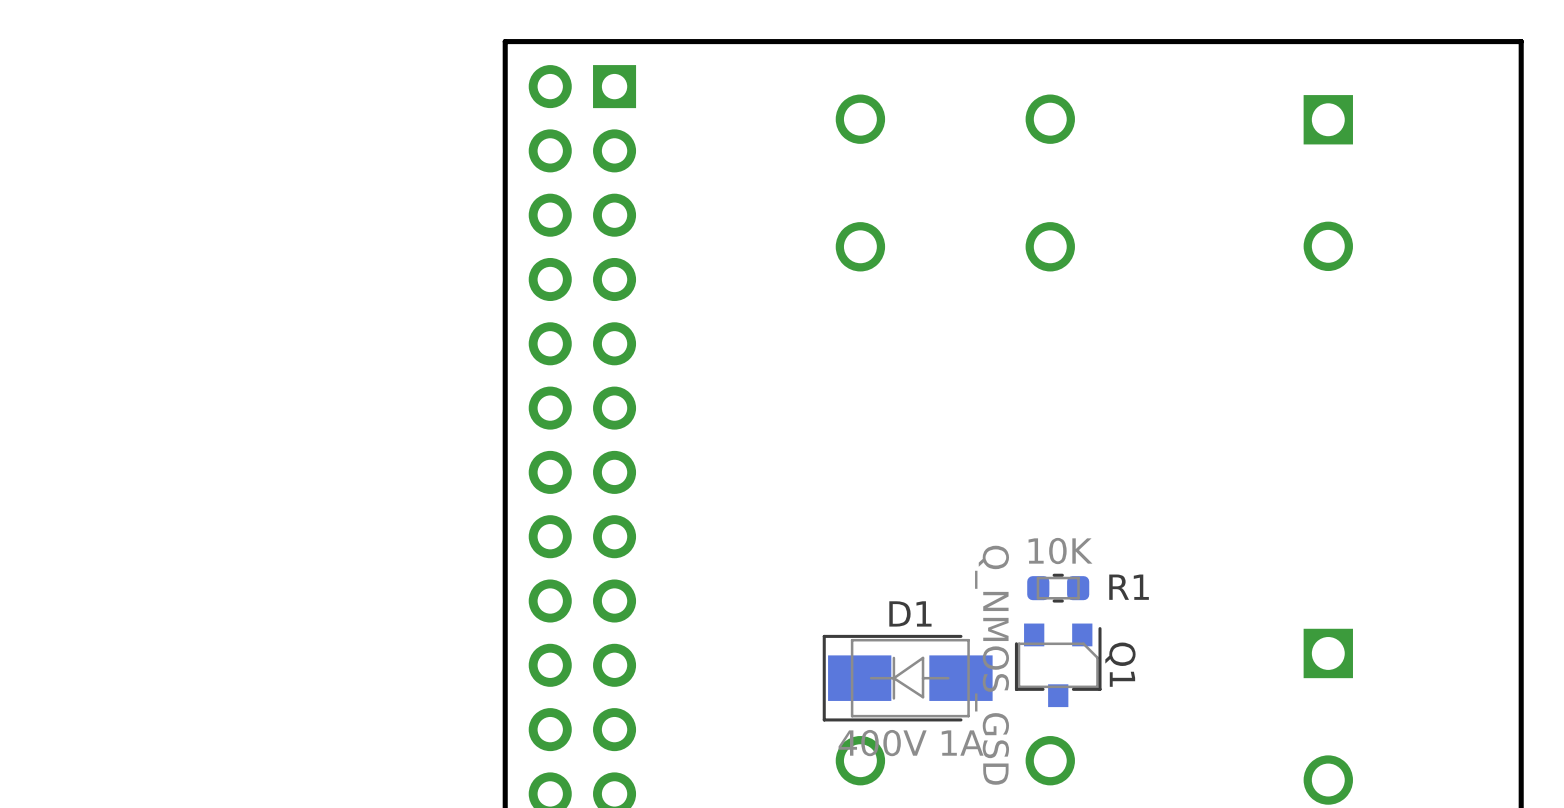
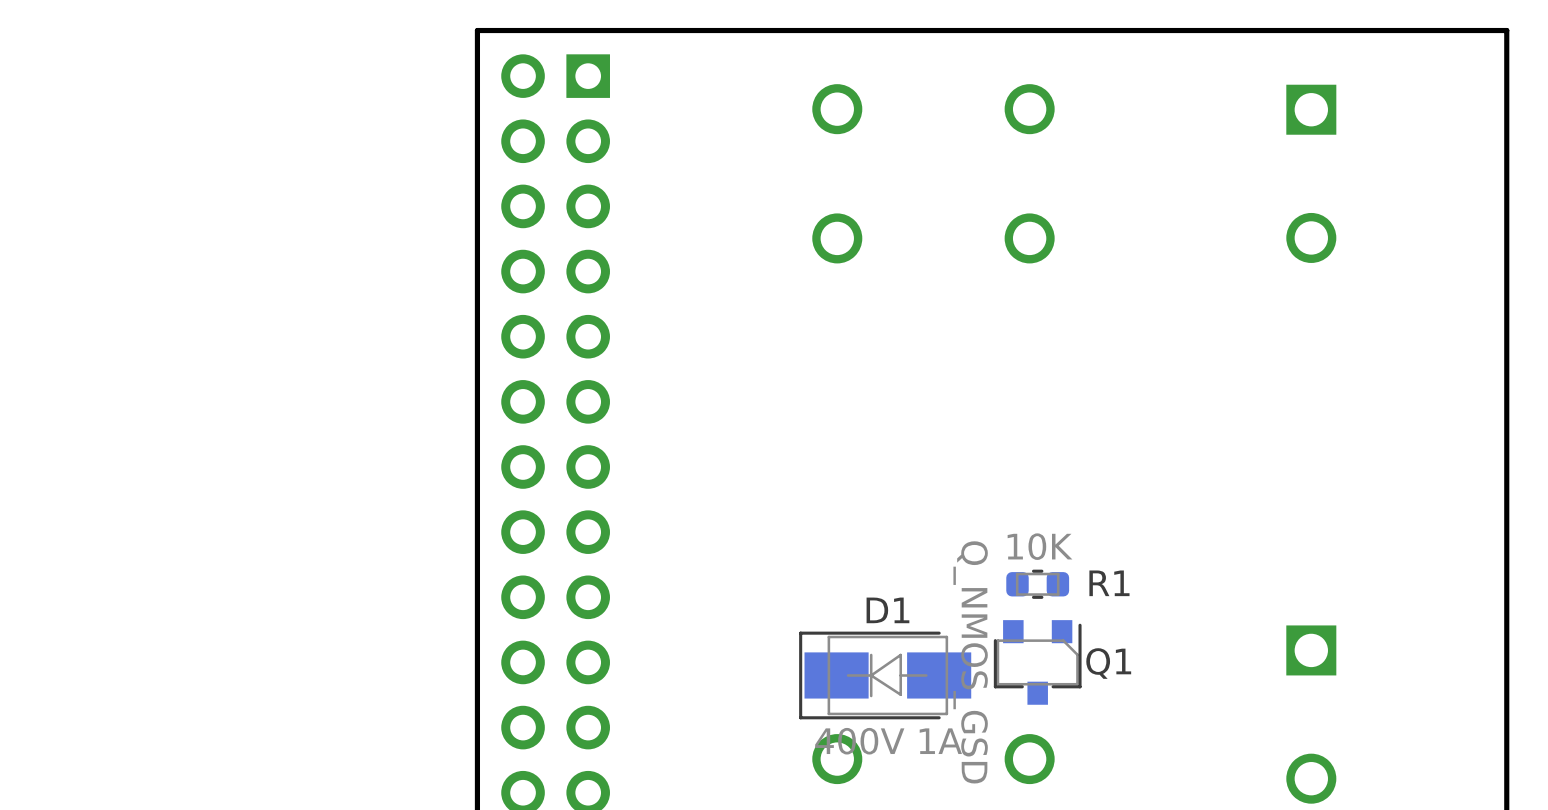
Q1 name rotation: 0° (1120, 664) -> 90° counterclockwise (1108, 663)

